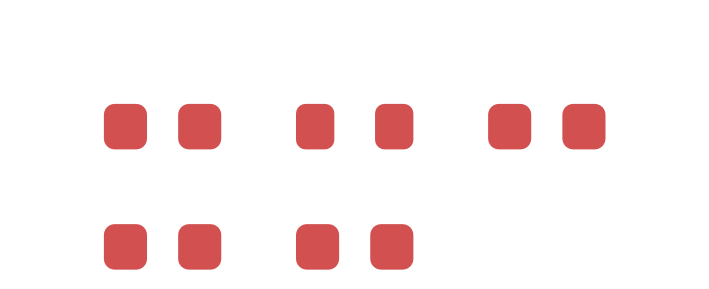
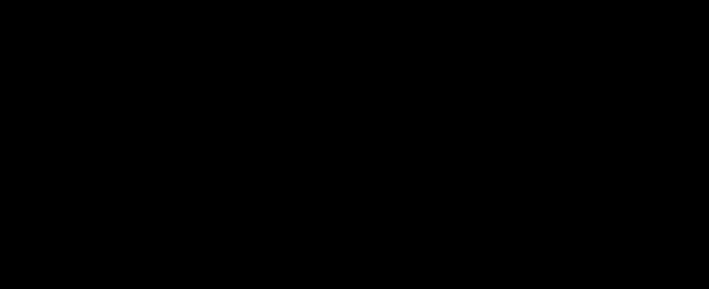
part: (162, 126) -> none
part: (354, 126) -> none
part: (546, 126) -> none
part: (162, 246) -> none
part: (354, 246) -> none

